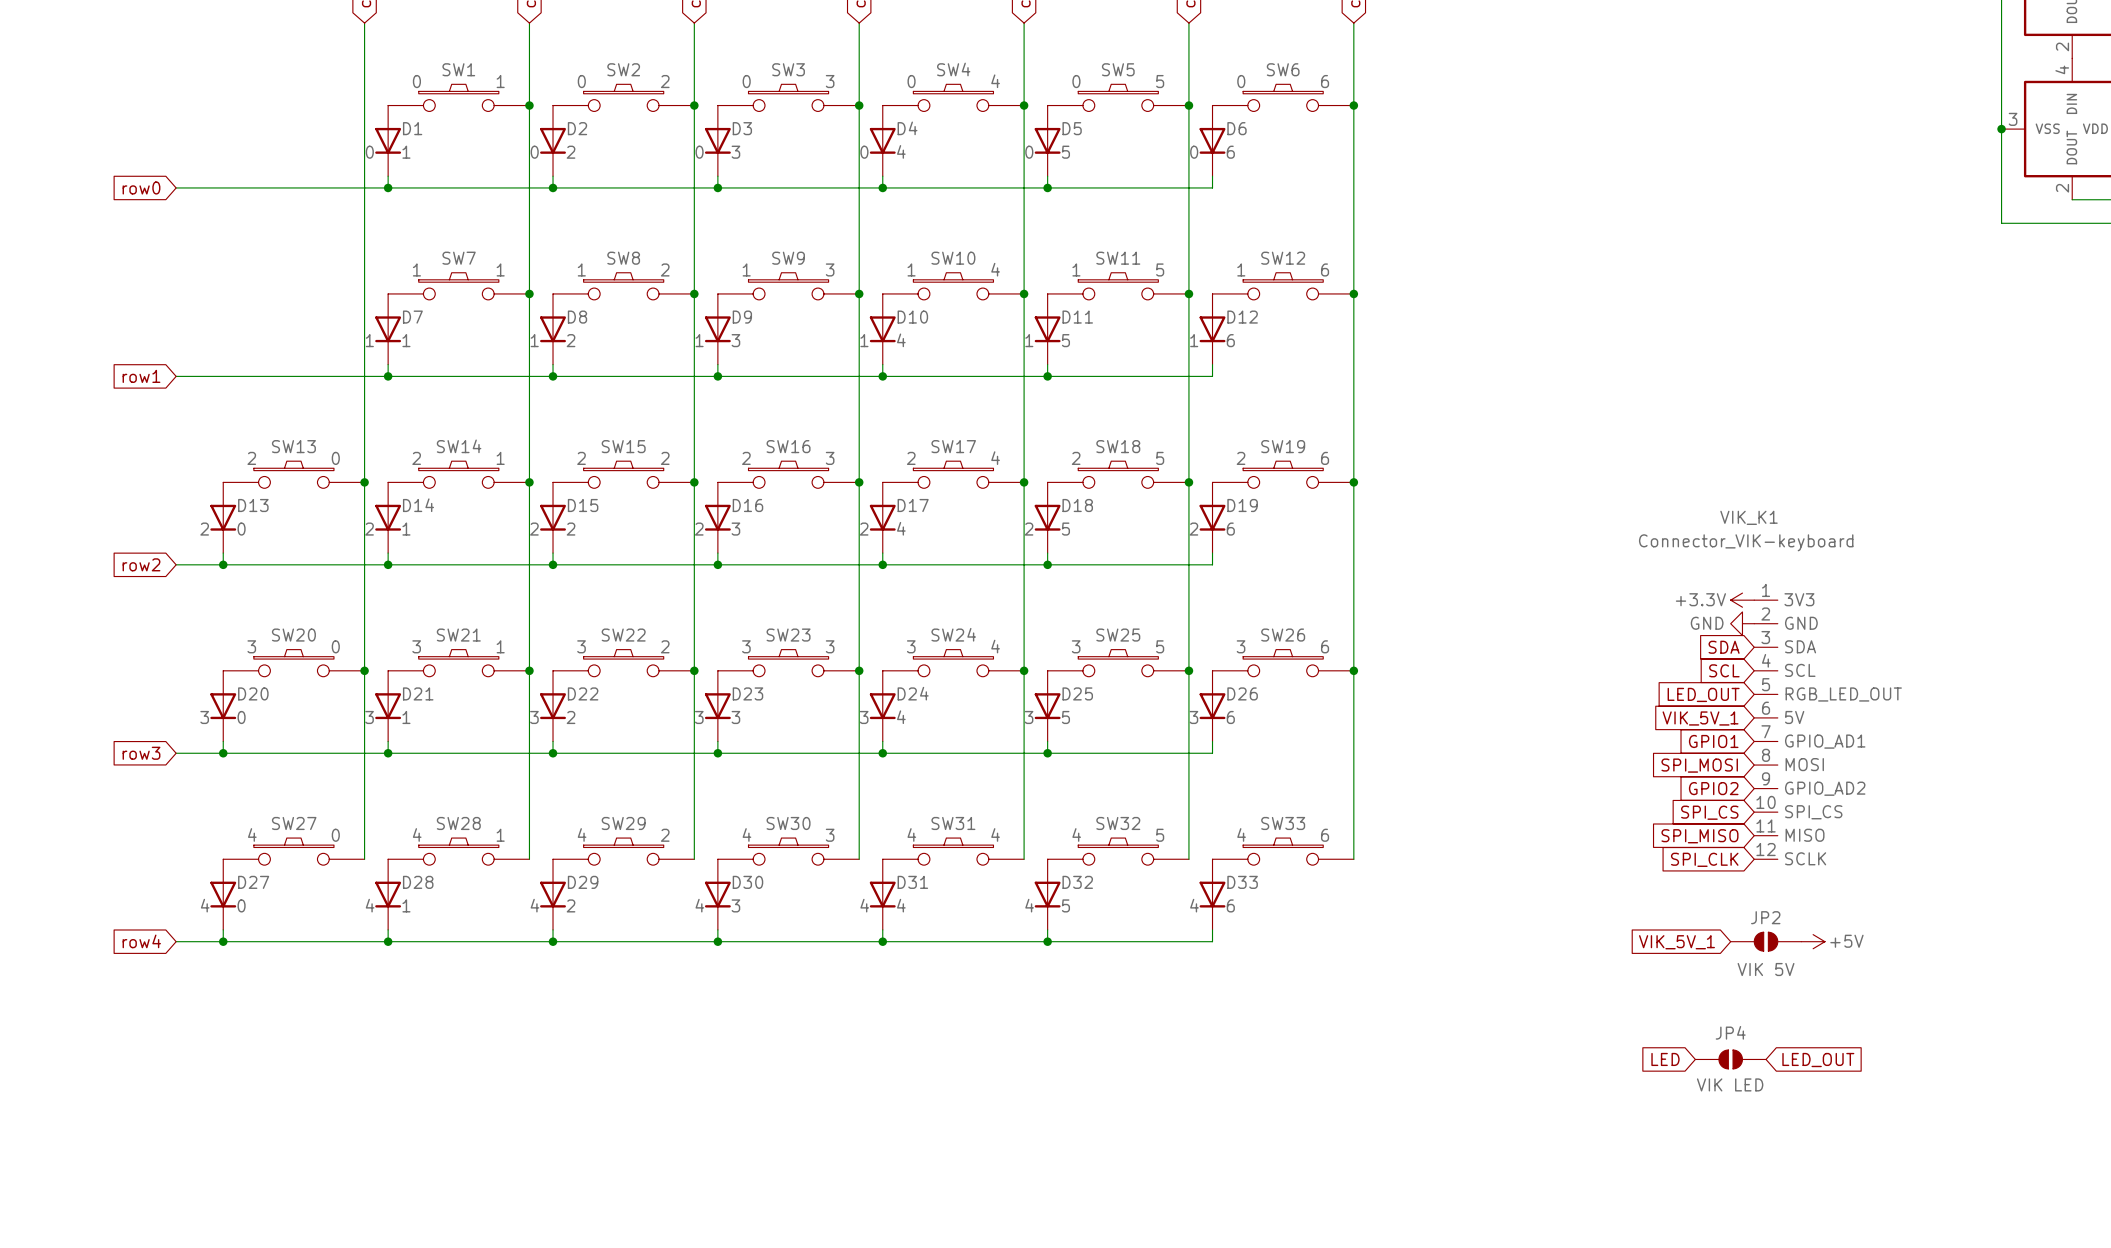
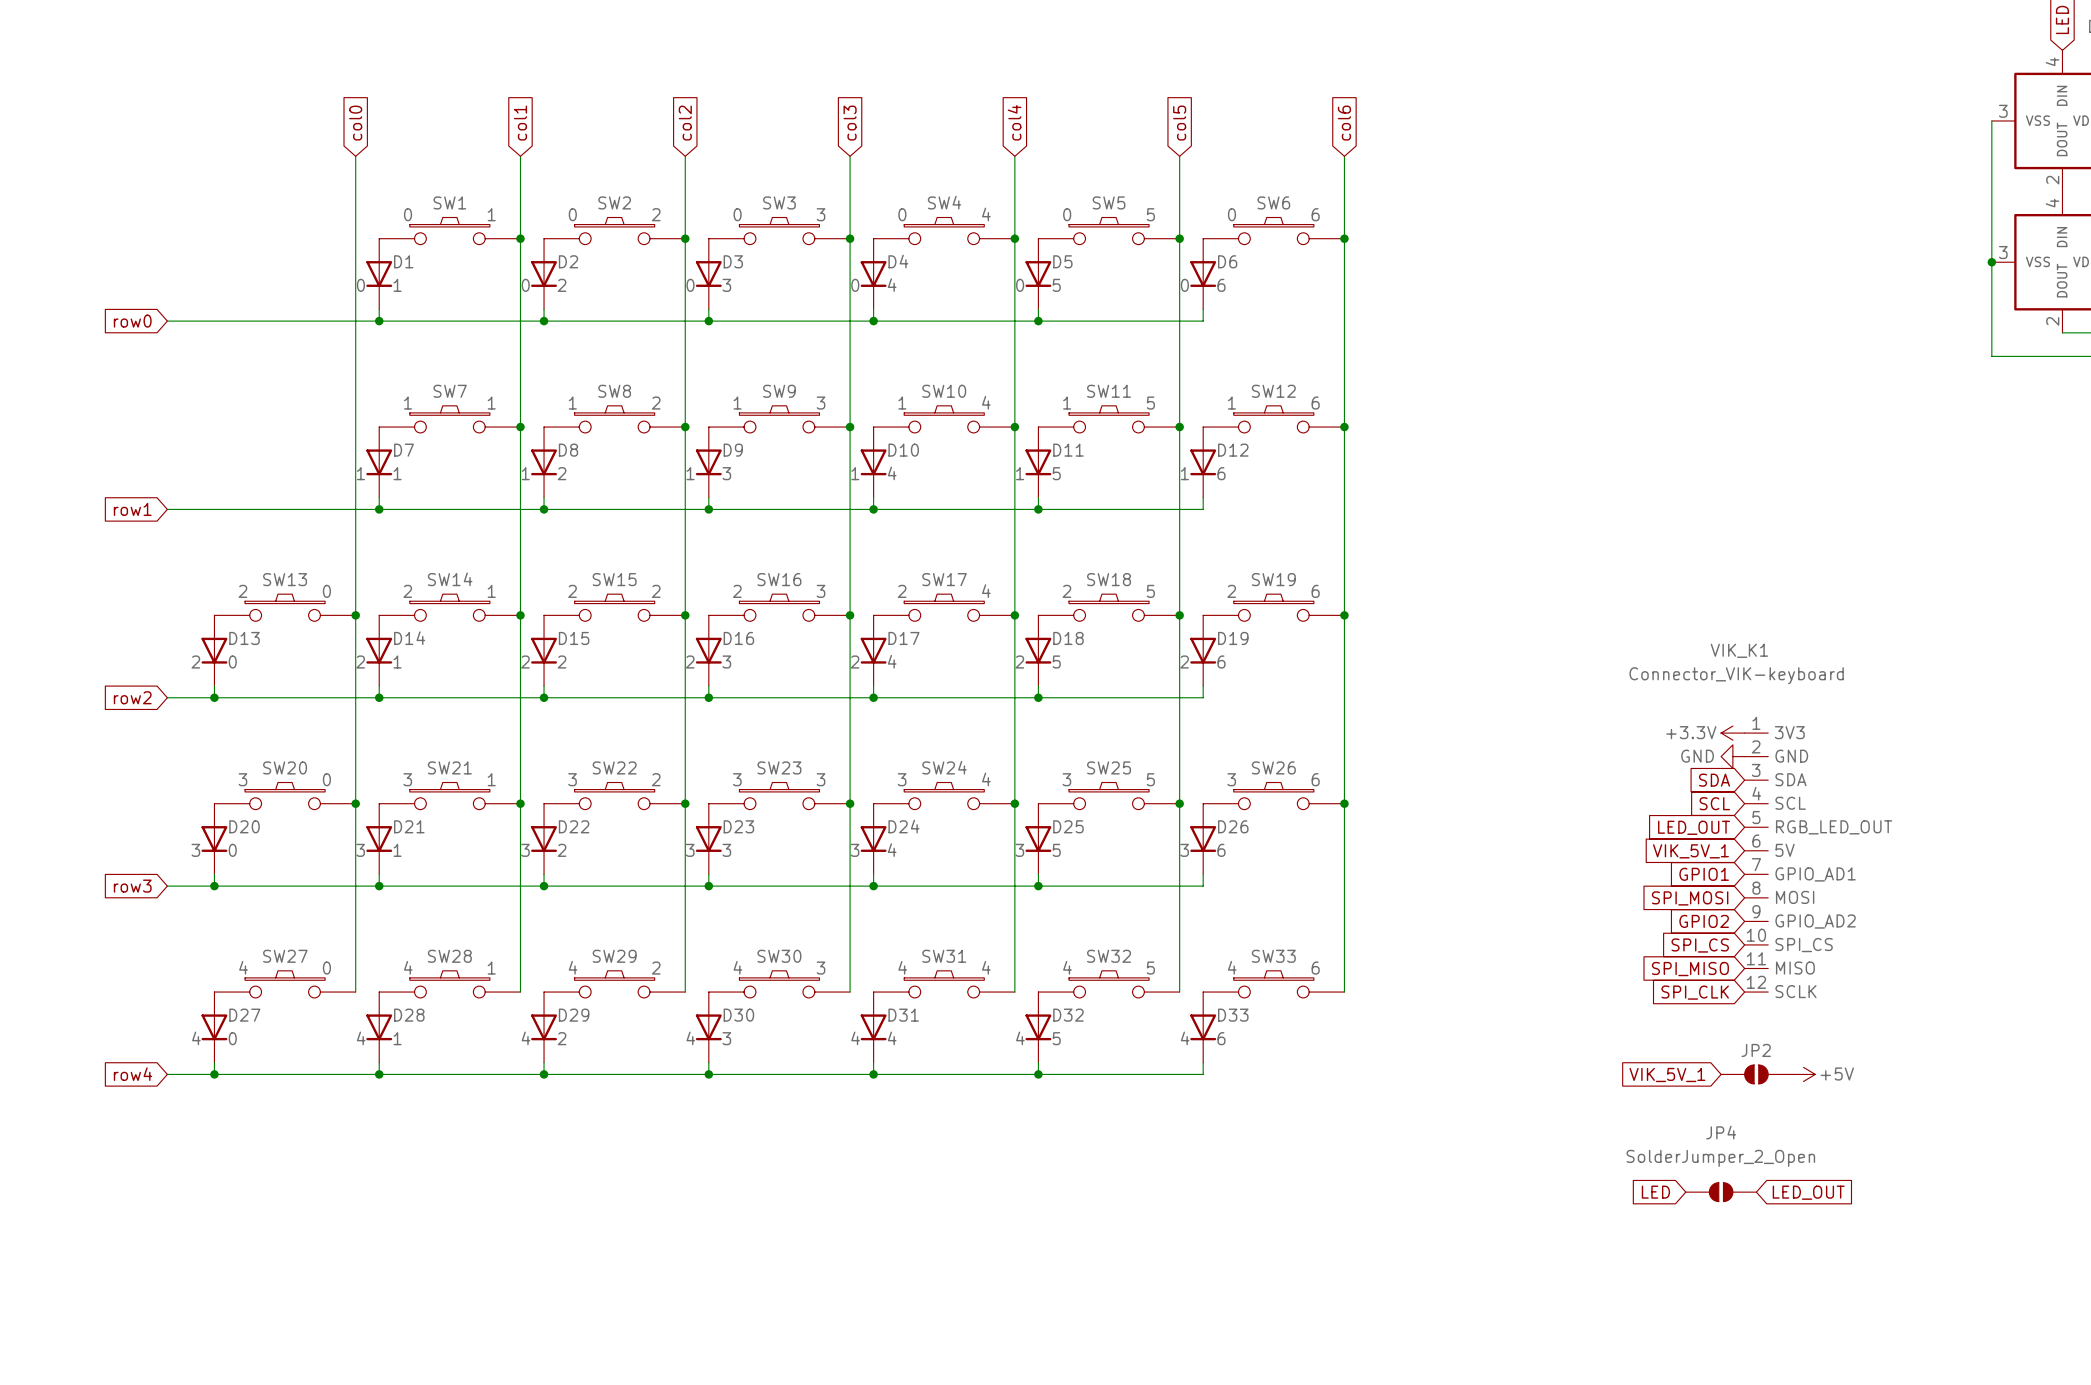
JP2 value: VIK 5V (1766, 969) -> none
JP4 name position: JP4 (1730, 1032) -> JP4 (1721, 1132)
JP4 value: VIK LED (1730, 1084) -> SolderJumper_2_Open (1720, 1158)

